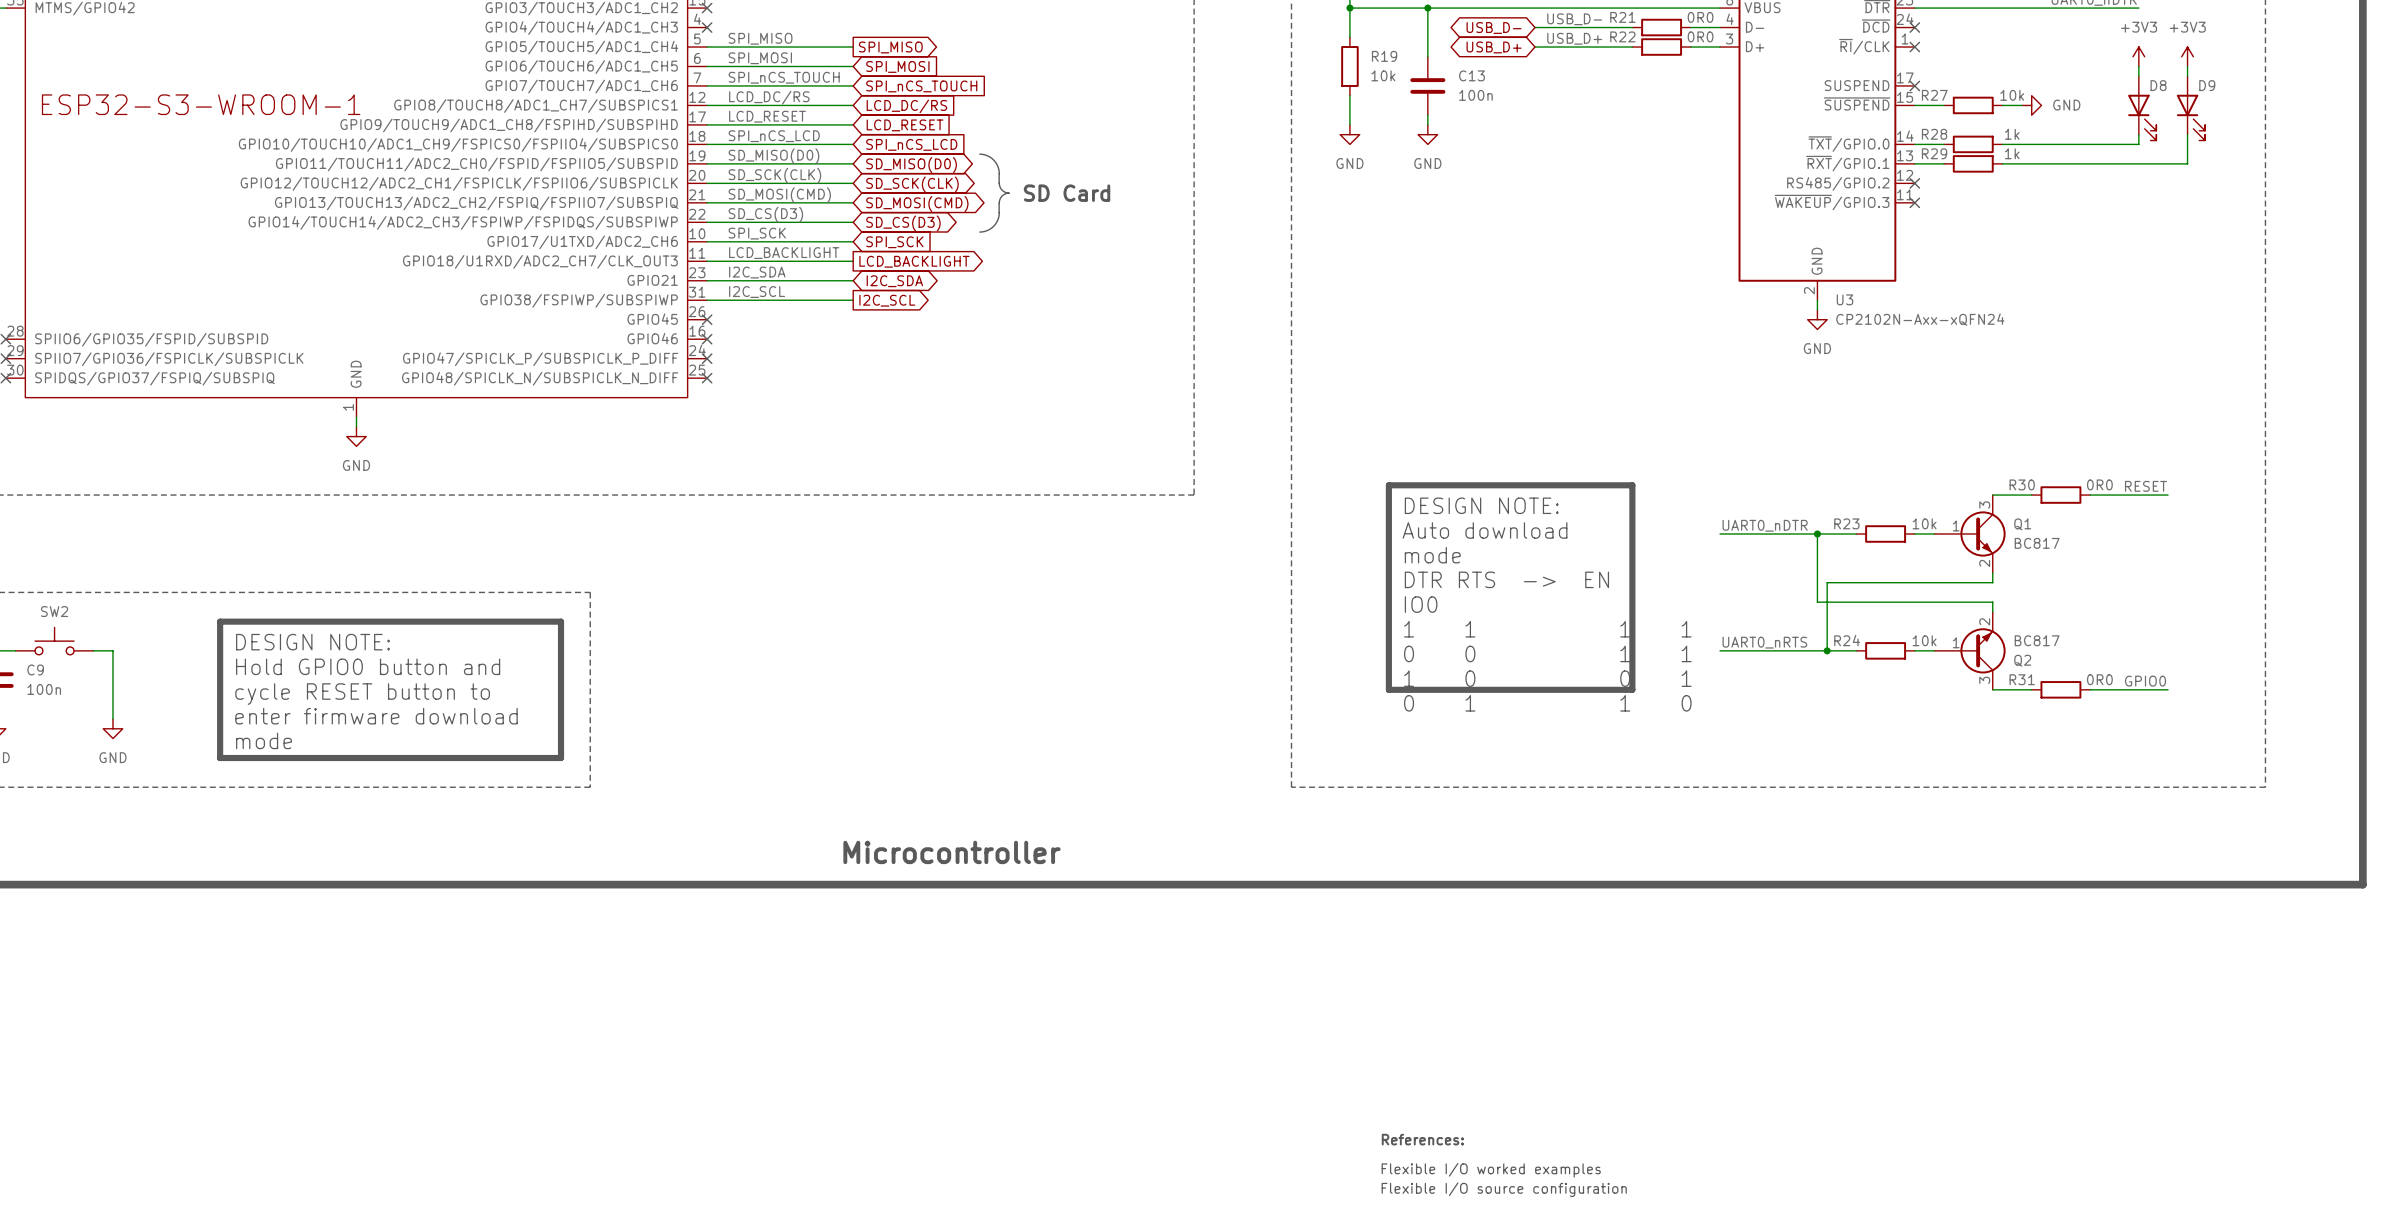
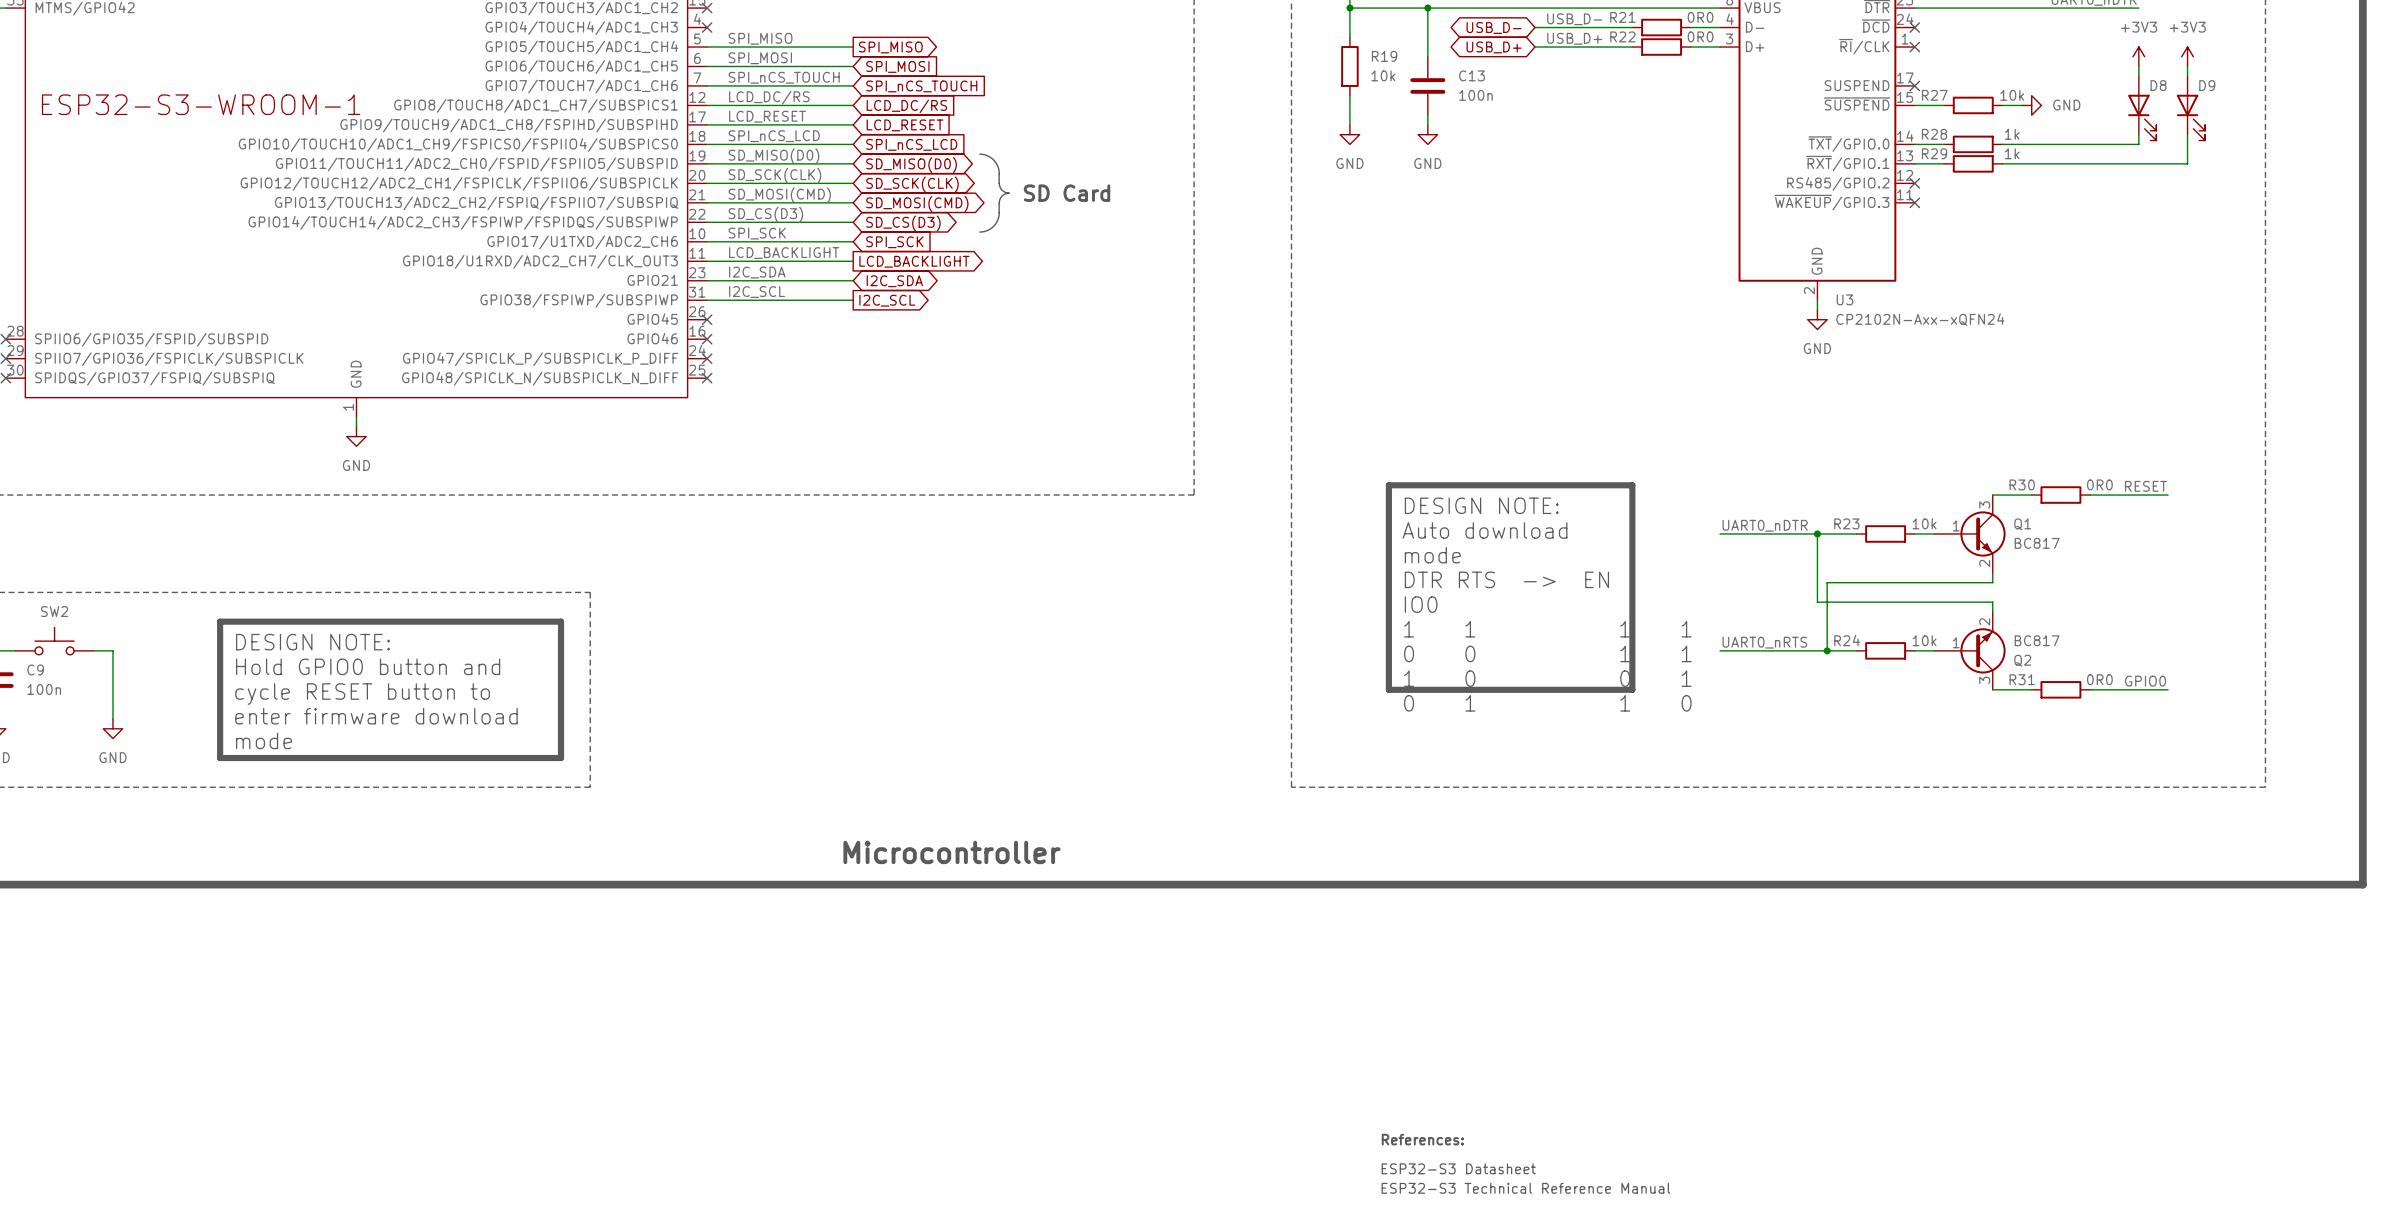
text: Flexible I/O worked examples (1491, 1170) -> ESP32-S3 Datasheet (1458, 1168)
text: Flexible I/O source configuration (1504, 1189) -> ESP32-S3 Technical Reference Manual (1526, 1188)

